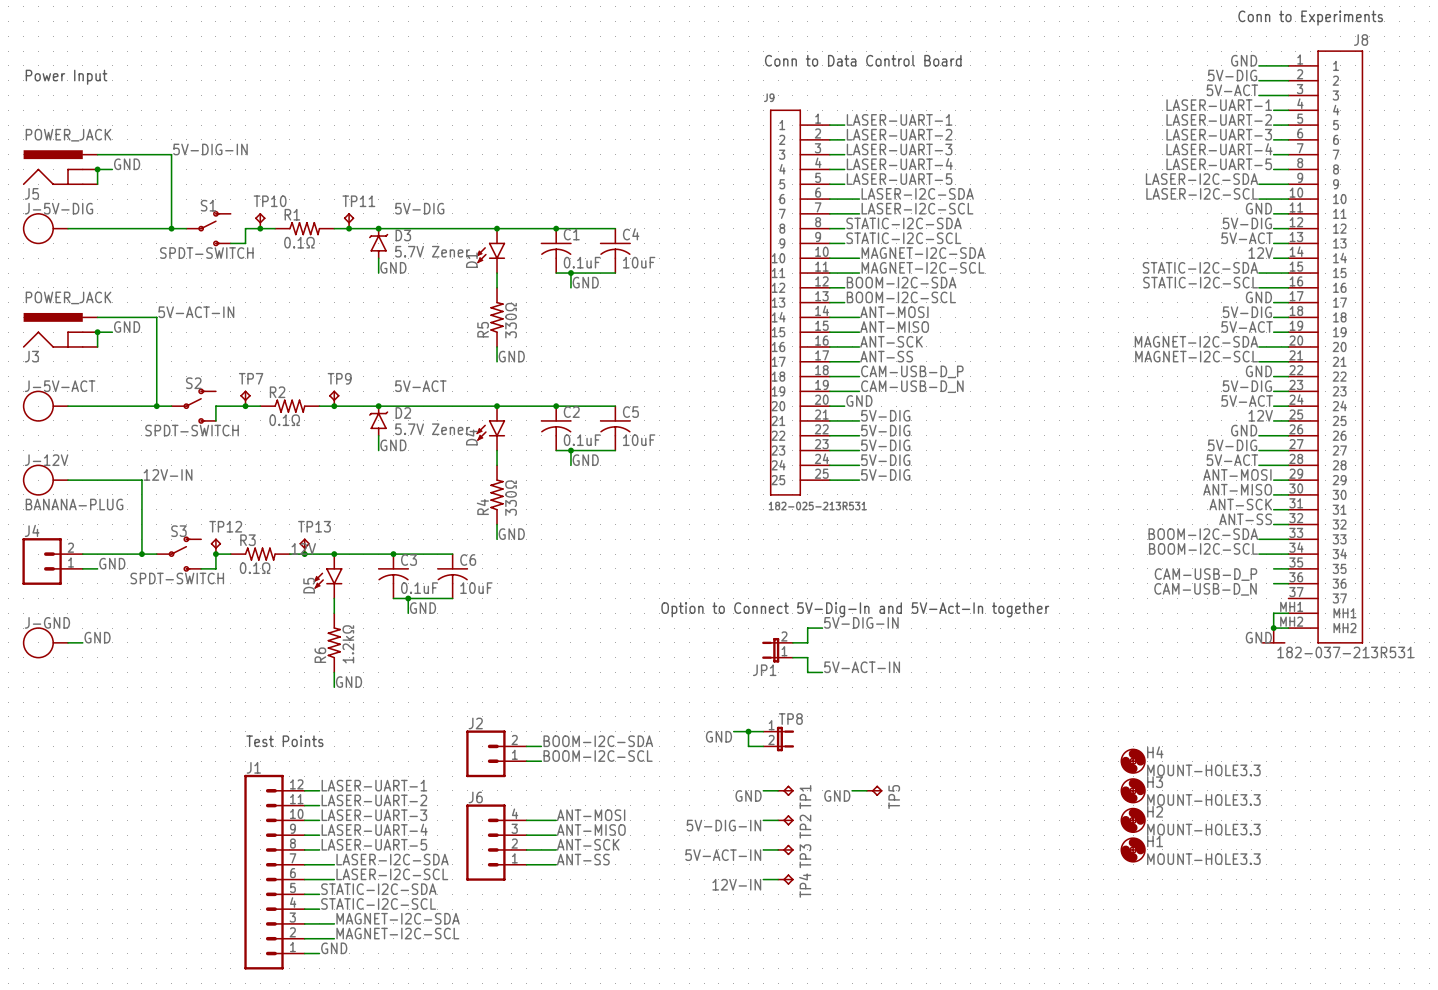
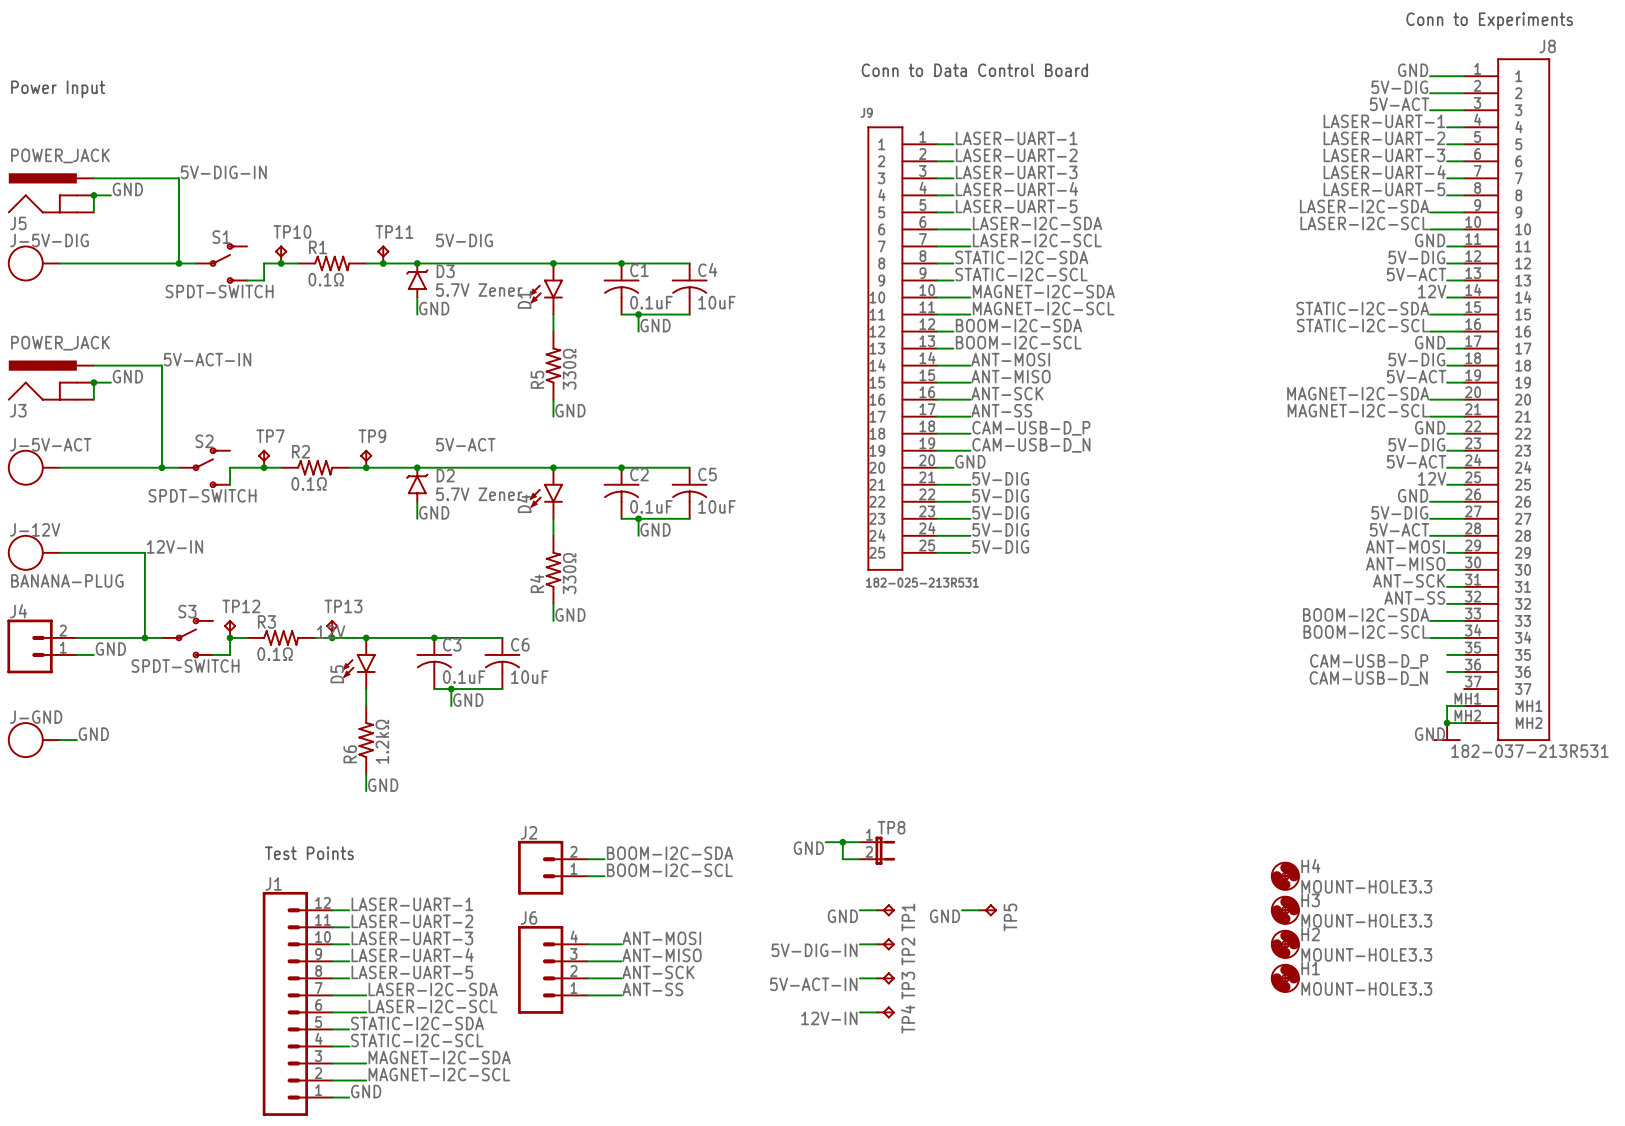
text: Option to Connect 5V-Dig-In and 5V-Act-In together (855, 609) -> none
label: 5V-DIG-IN (861, 622) -> none
wire: (822, 628) (807, 628) (807, 642) (792, 642) -> none
JP1: (777, 650) -> none
wire: (792, 657) (807, 657) (807, 672) (822, 672) -> none
label: 5V-ACT-IN (862, 667) -> none

